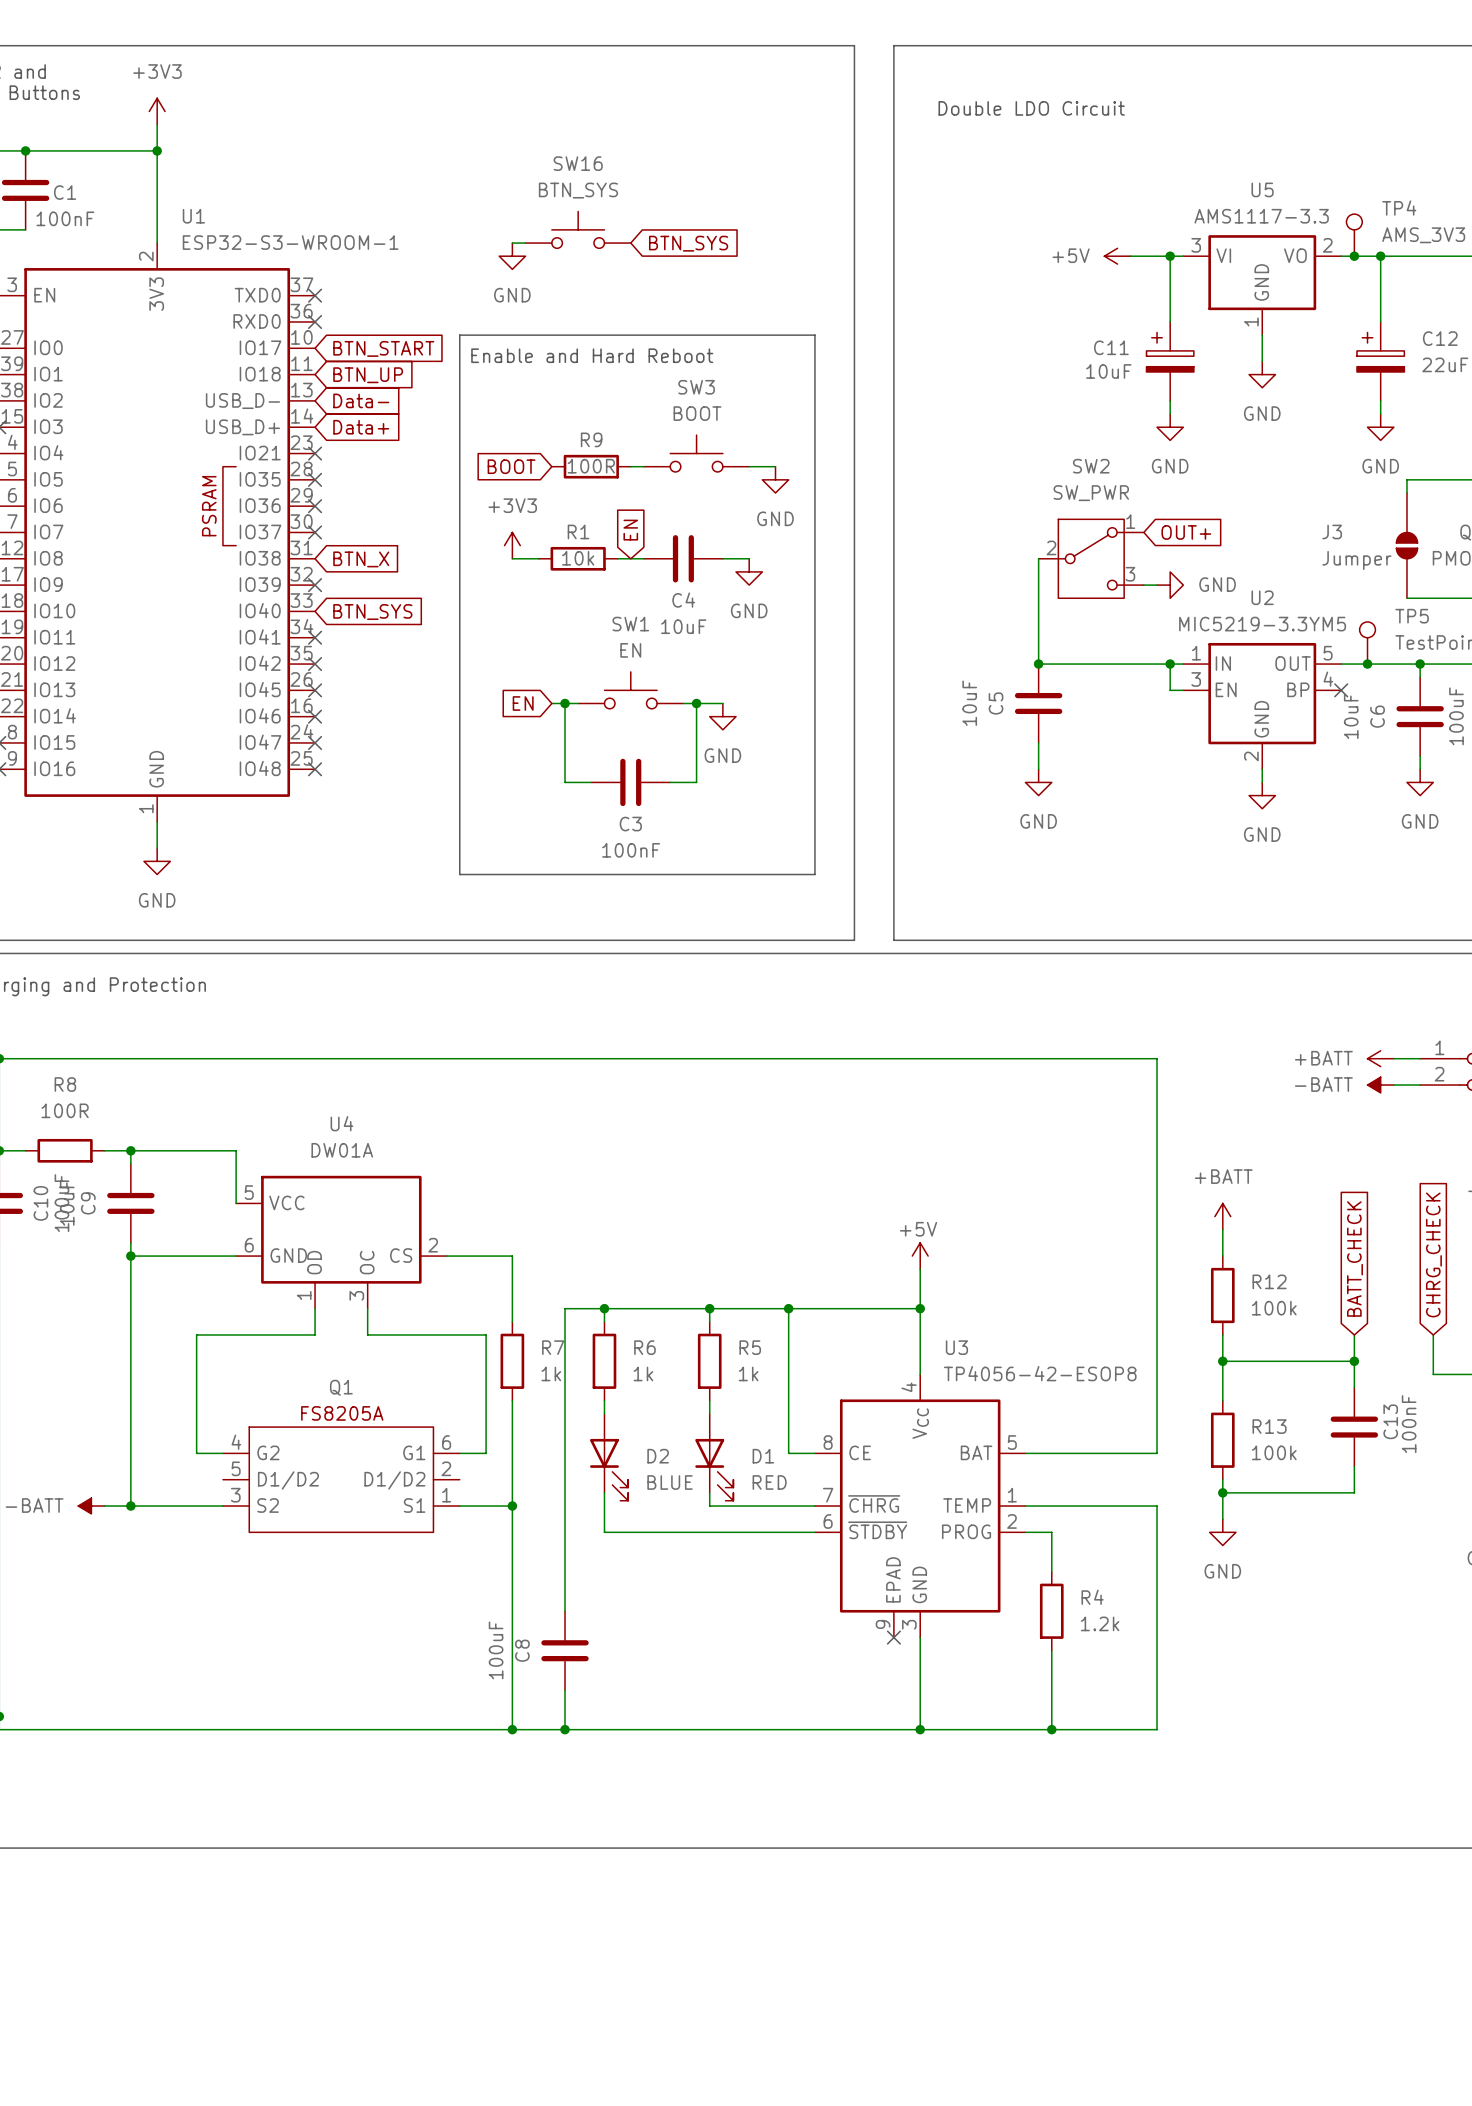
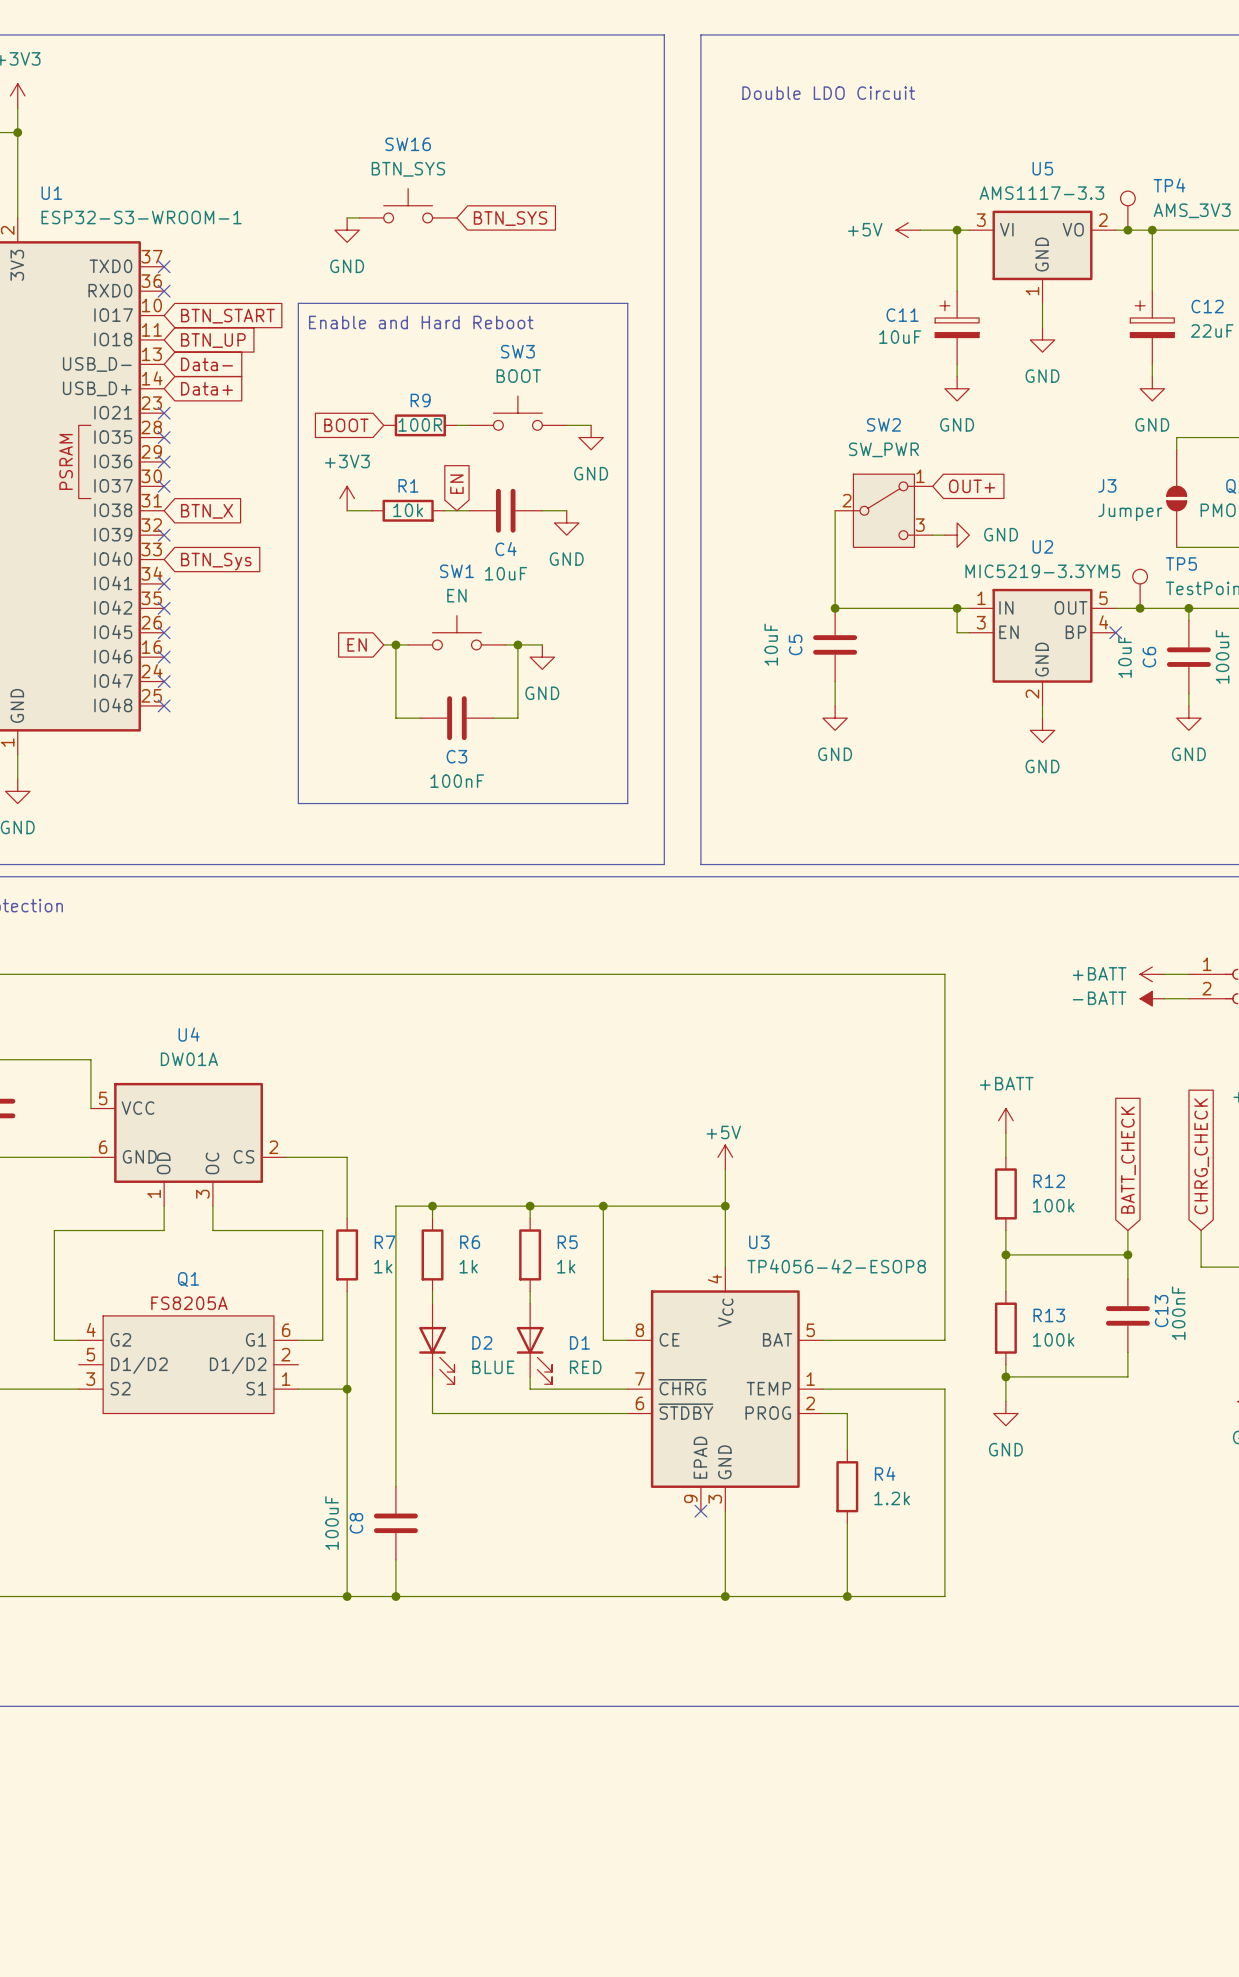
global label: BTN_SYS (372, 612) -> BTN_Sys (216, 561)

